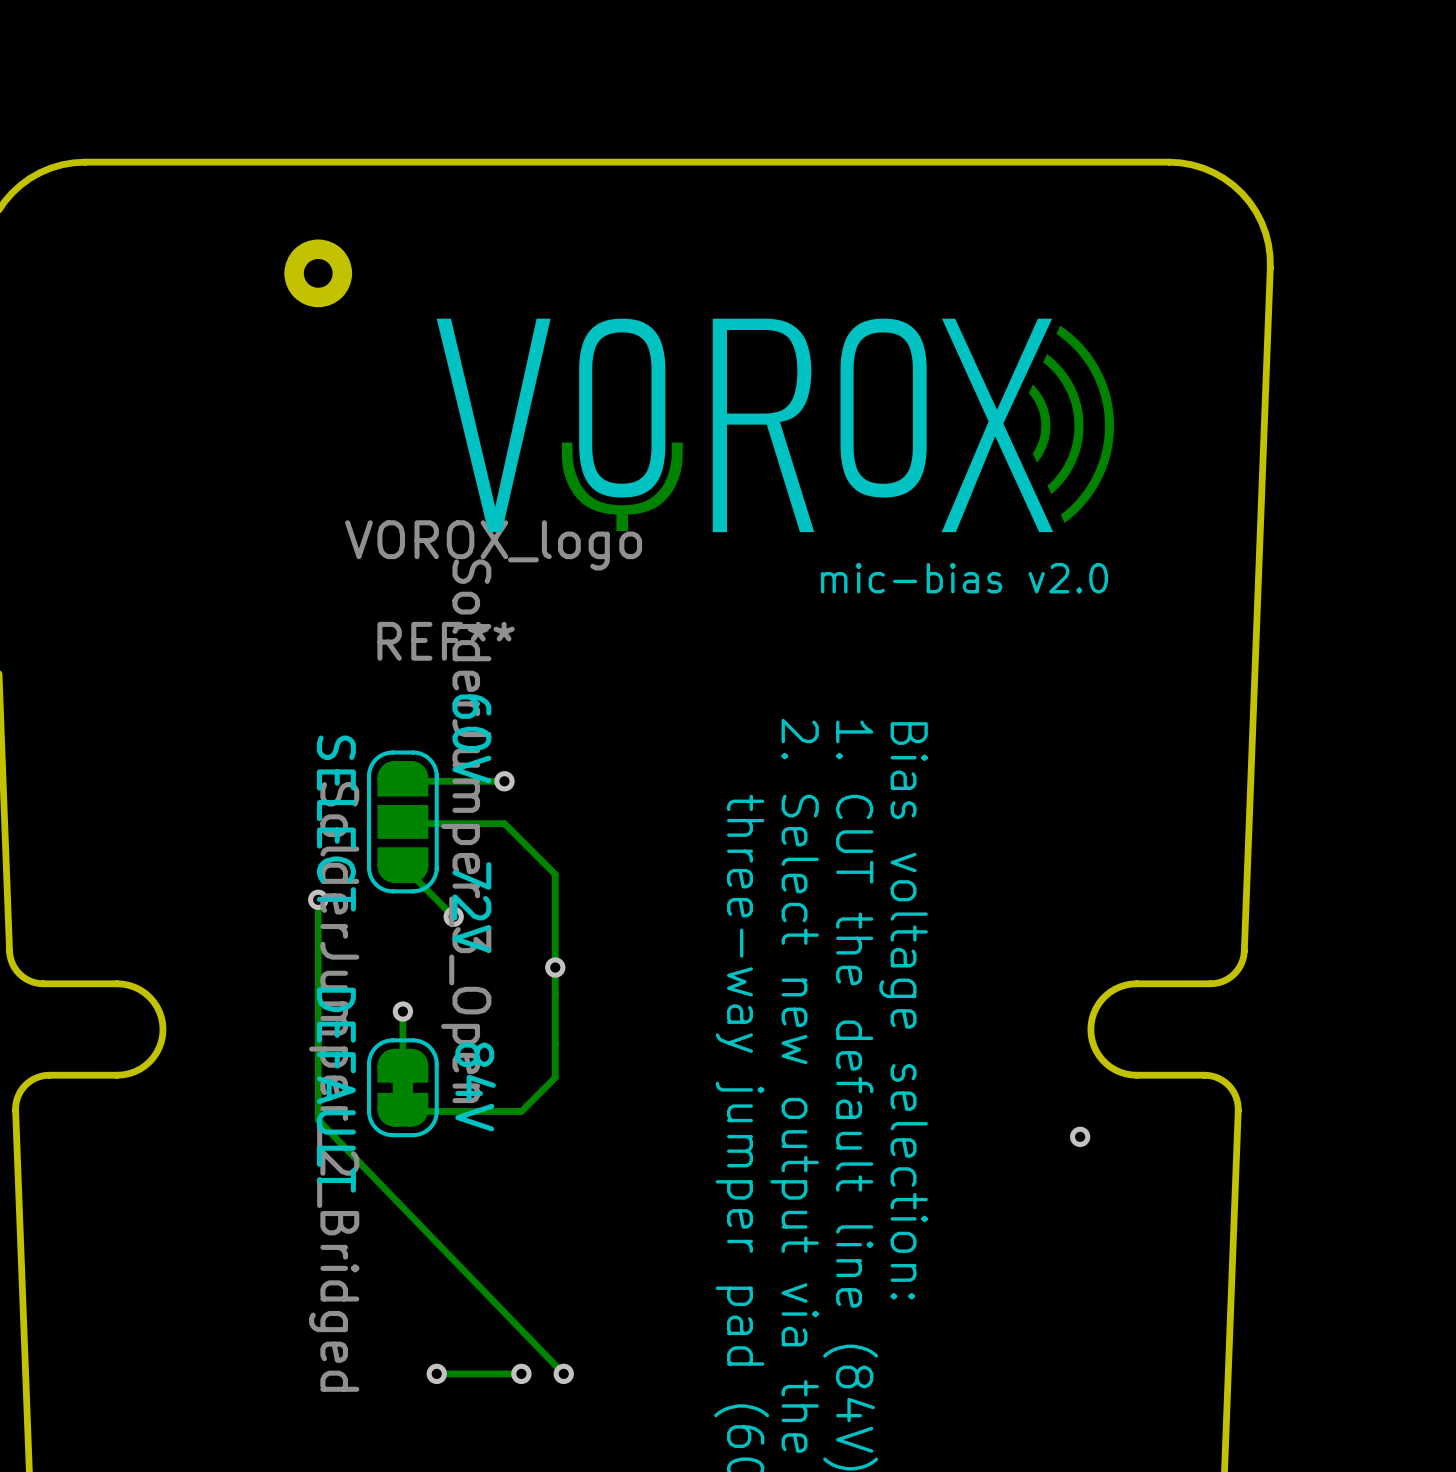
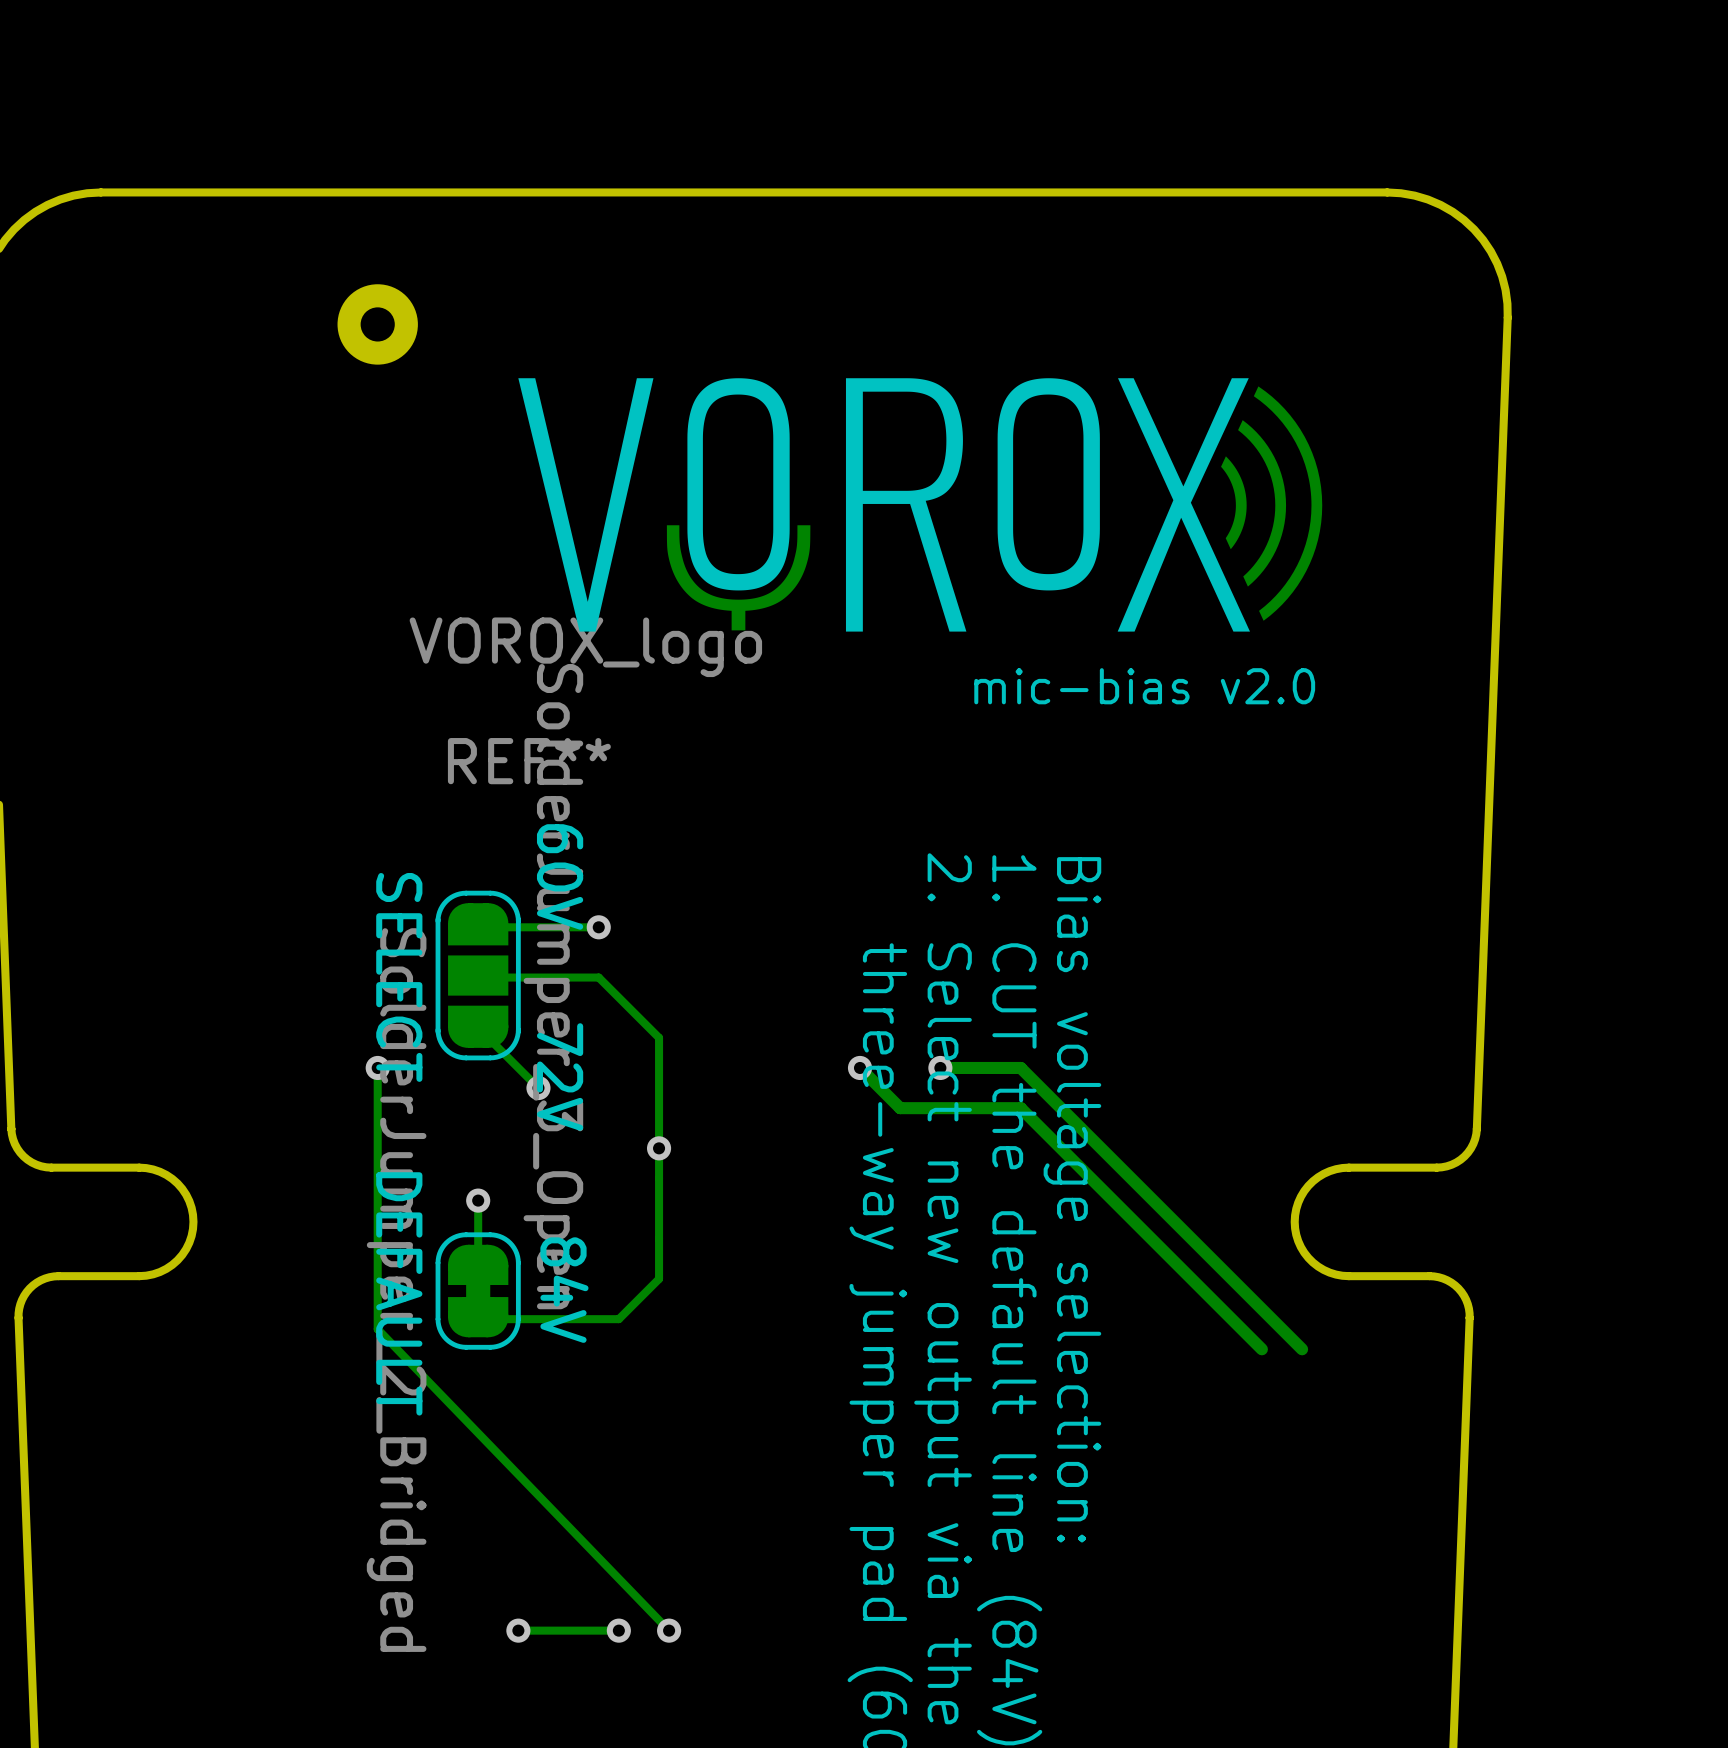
track: none -> (860, 1067) (900, 1108) (1020, 1108) (1261, 1349)
via: none -> (860, 1067)
track: none -> (940, 1067) (1020, 1067) (1302, 1349)
via: none -> (940, 1067)
via: (1080, 1136) -> none

